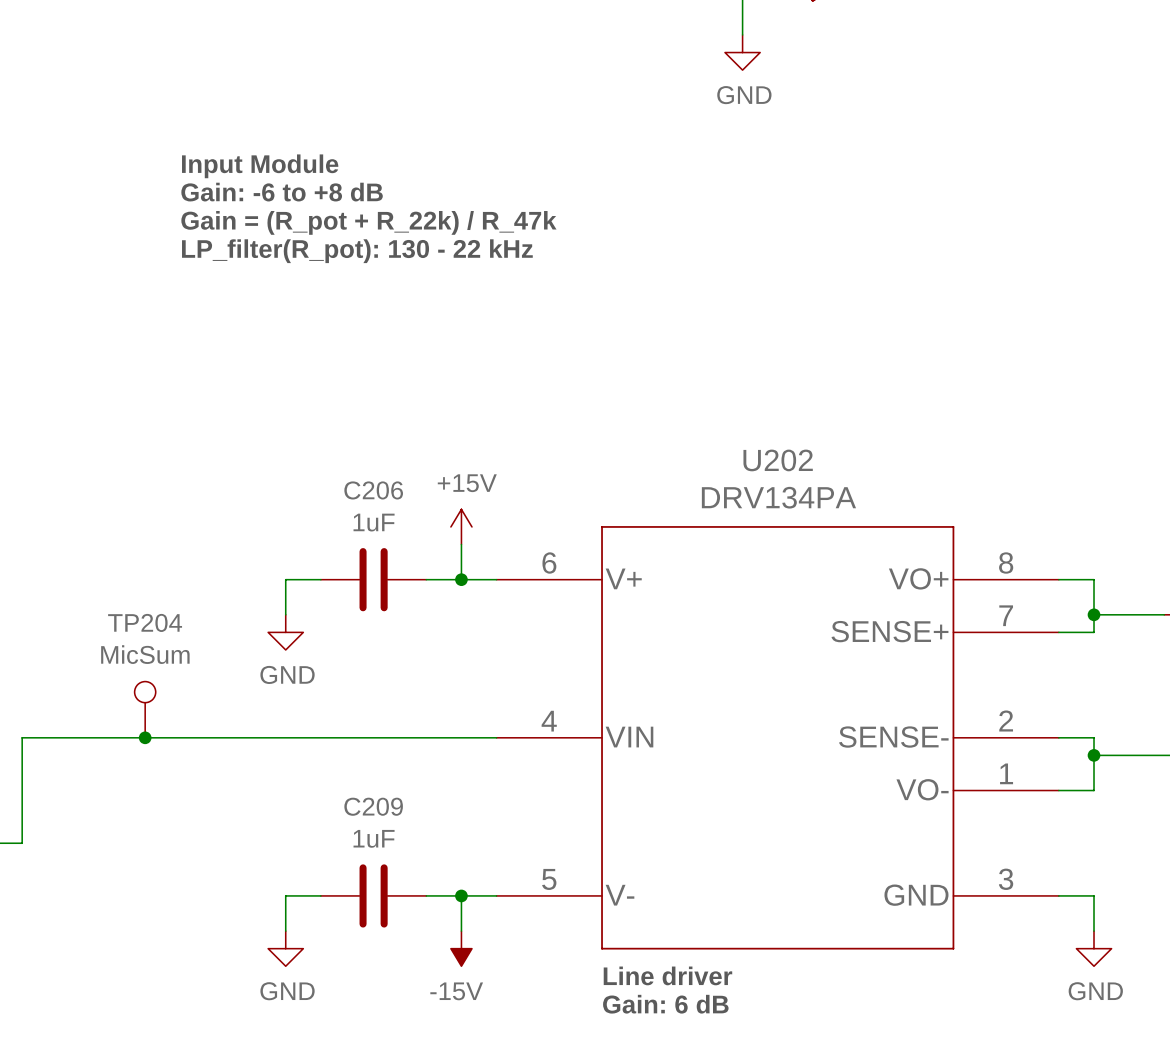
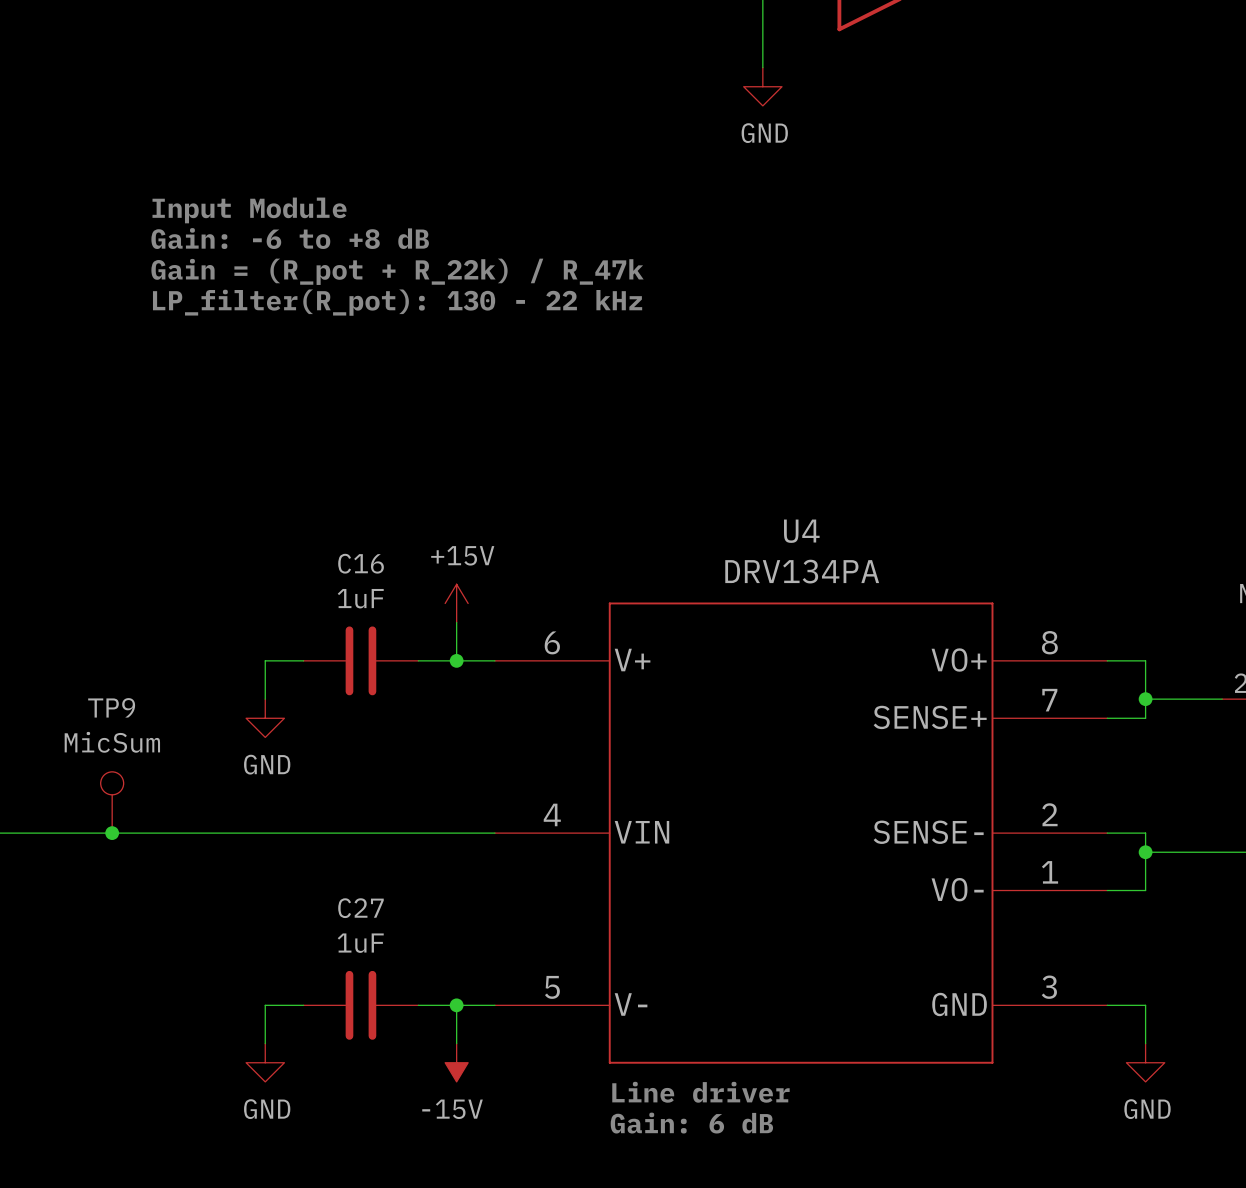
U202 name: U202 (778, 460) -> U4 (801, 531)
C206 name: C206 (373, 490) -> C16 (361, 563)
TP204 name: TP204 (145, 622) -> TP9 (111, 707)
C209 name: C209 (373, 806) -> C27 (360, 908)

